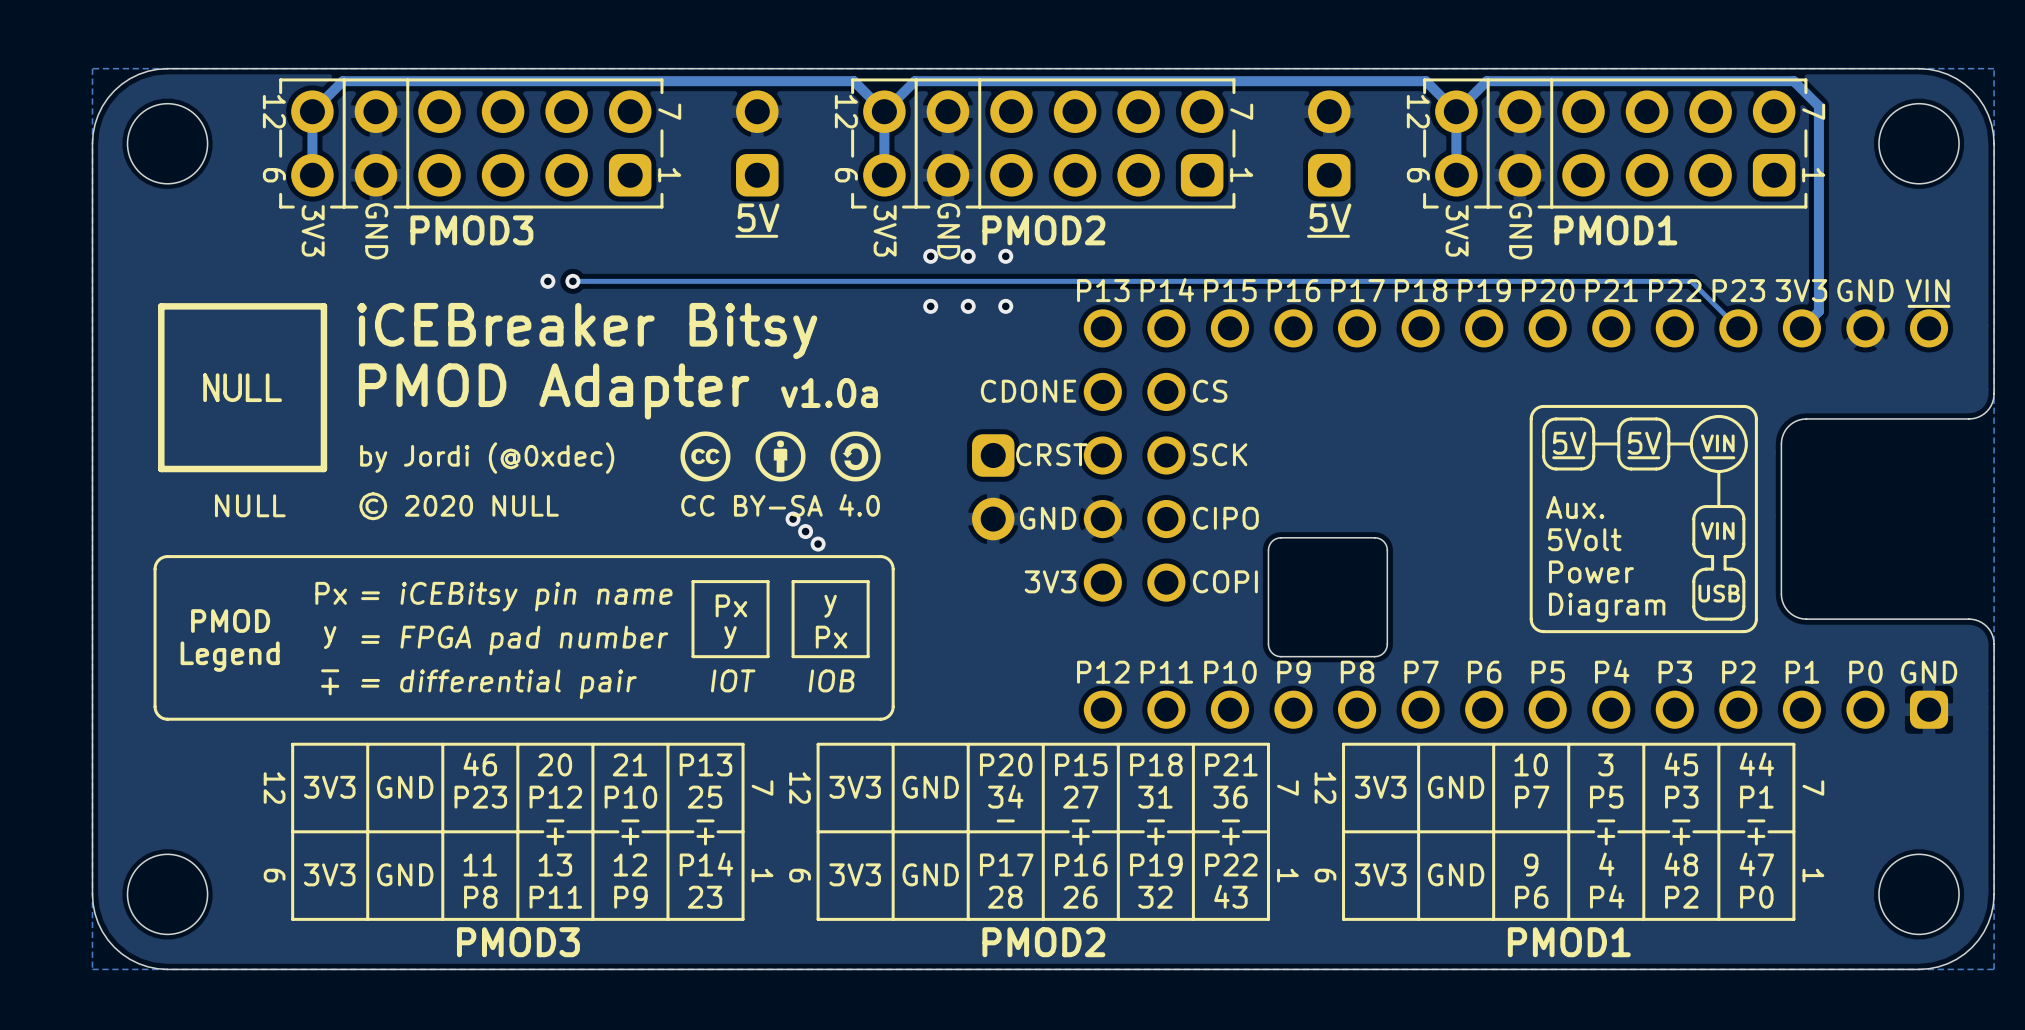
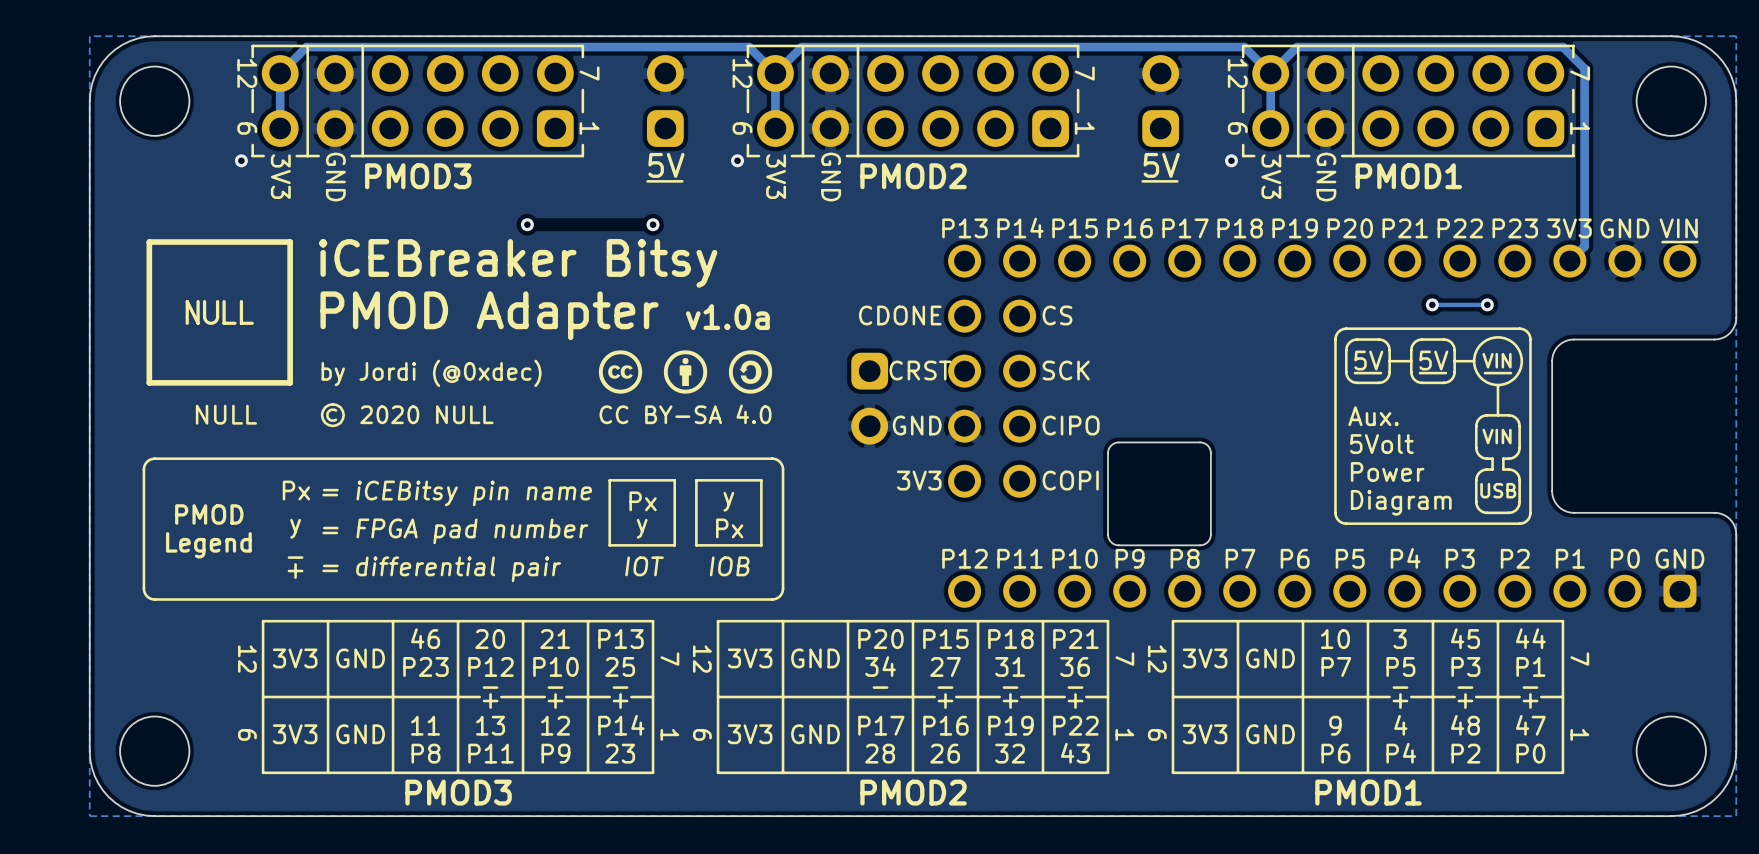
via: none -> (241, 160)
via: none -> (737, 160)
via: none -> (1231, 160)
via: (930, 256) -> none
via: (968, 256) -> none
via: (1005, 256) -> none
via: (547, 281) -> none
track: (572, 281) (1691, 281) (1738, 328) -> none
via: (572, 281) -> none
via: none -> (527, 224)
via: none -> (653, 224)
via: (930, 306) -> none
via: (968, 306) -> none
via: (1005, 306) -> none
via: none -> (1432, 304)
track: none -> (1487, 304) (1432, 304)
via: none -> (1487, 304)
via: (793, 519) -> none
via: (805, 531) -> none
via: (818, 544) -> none

